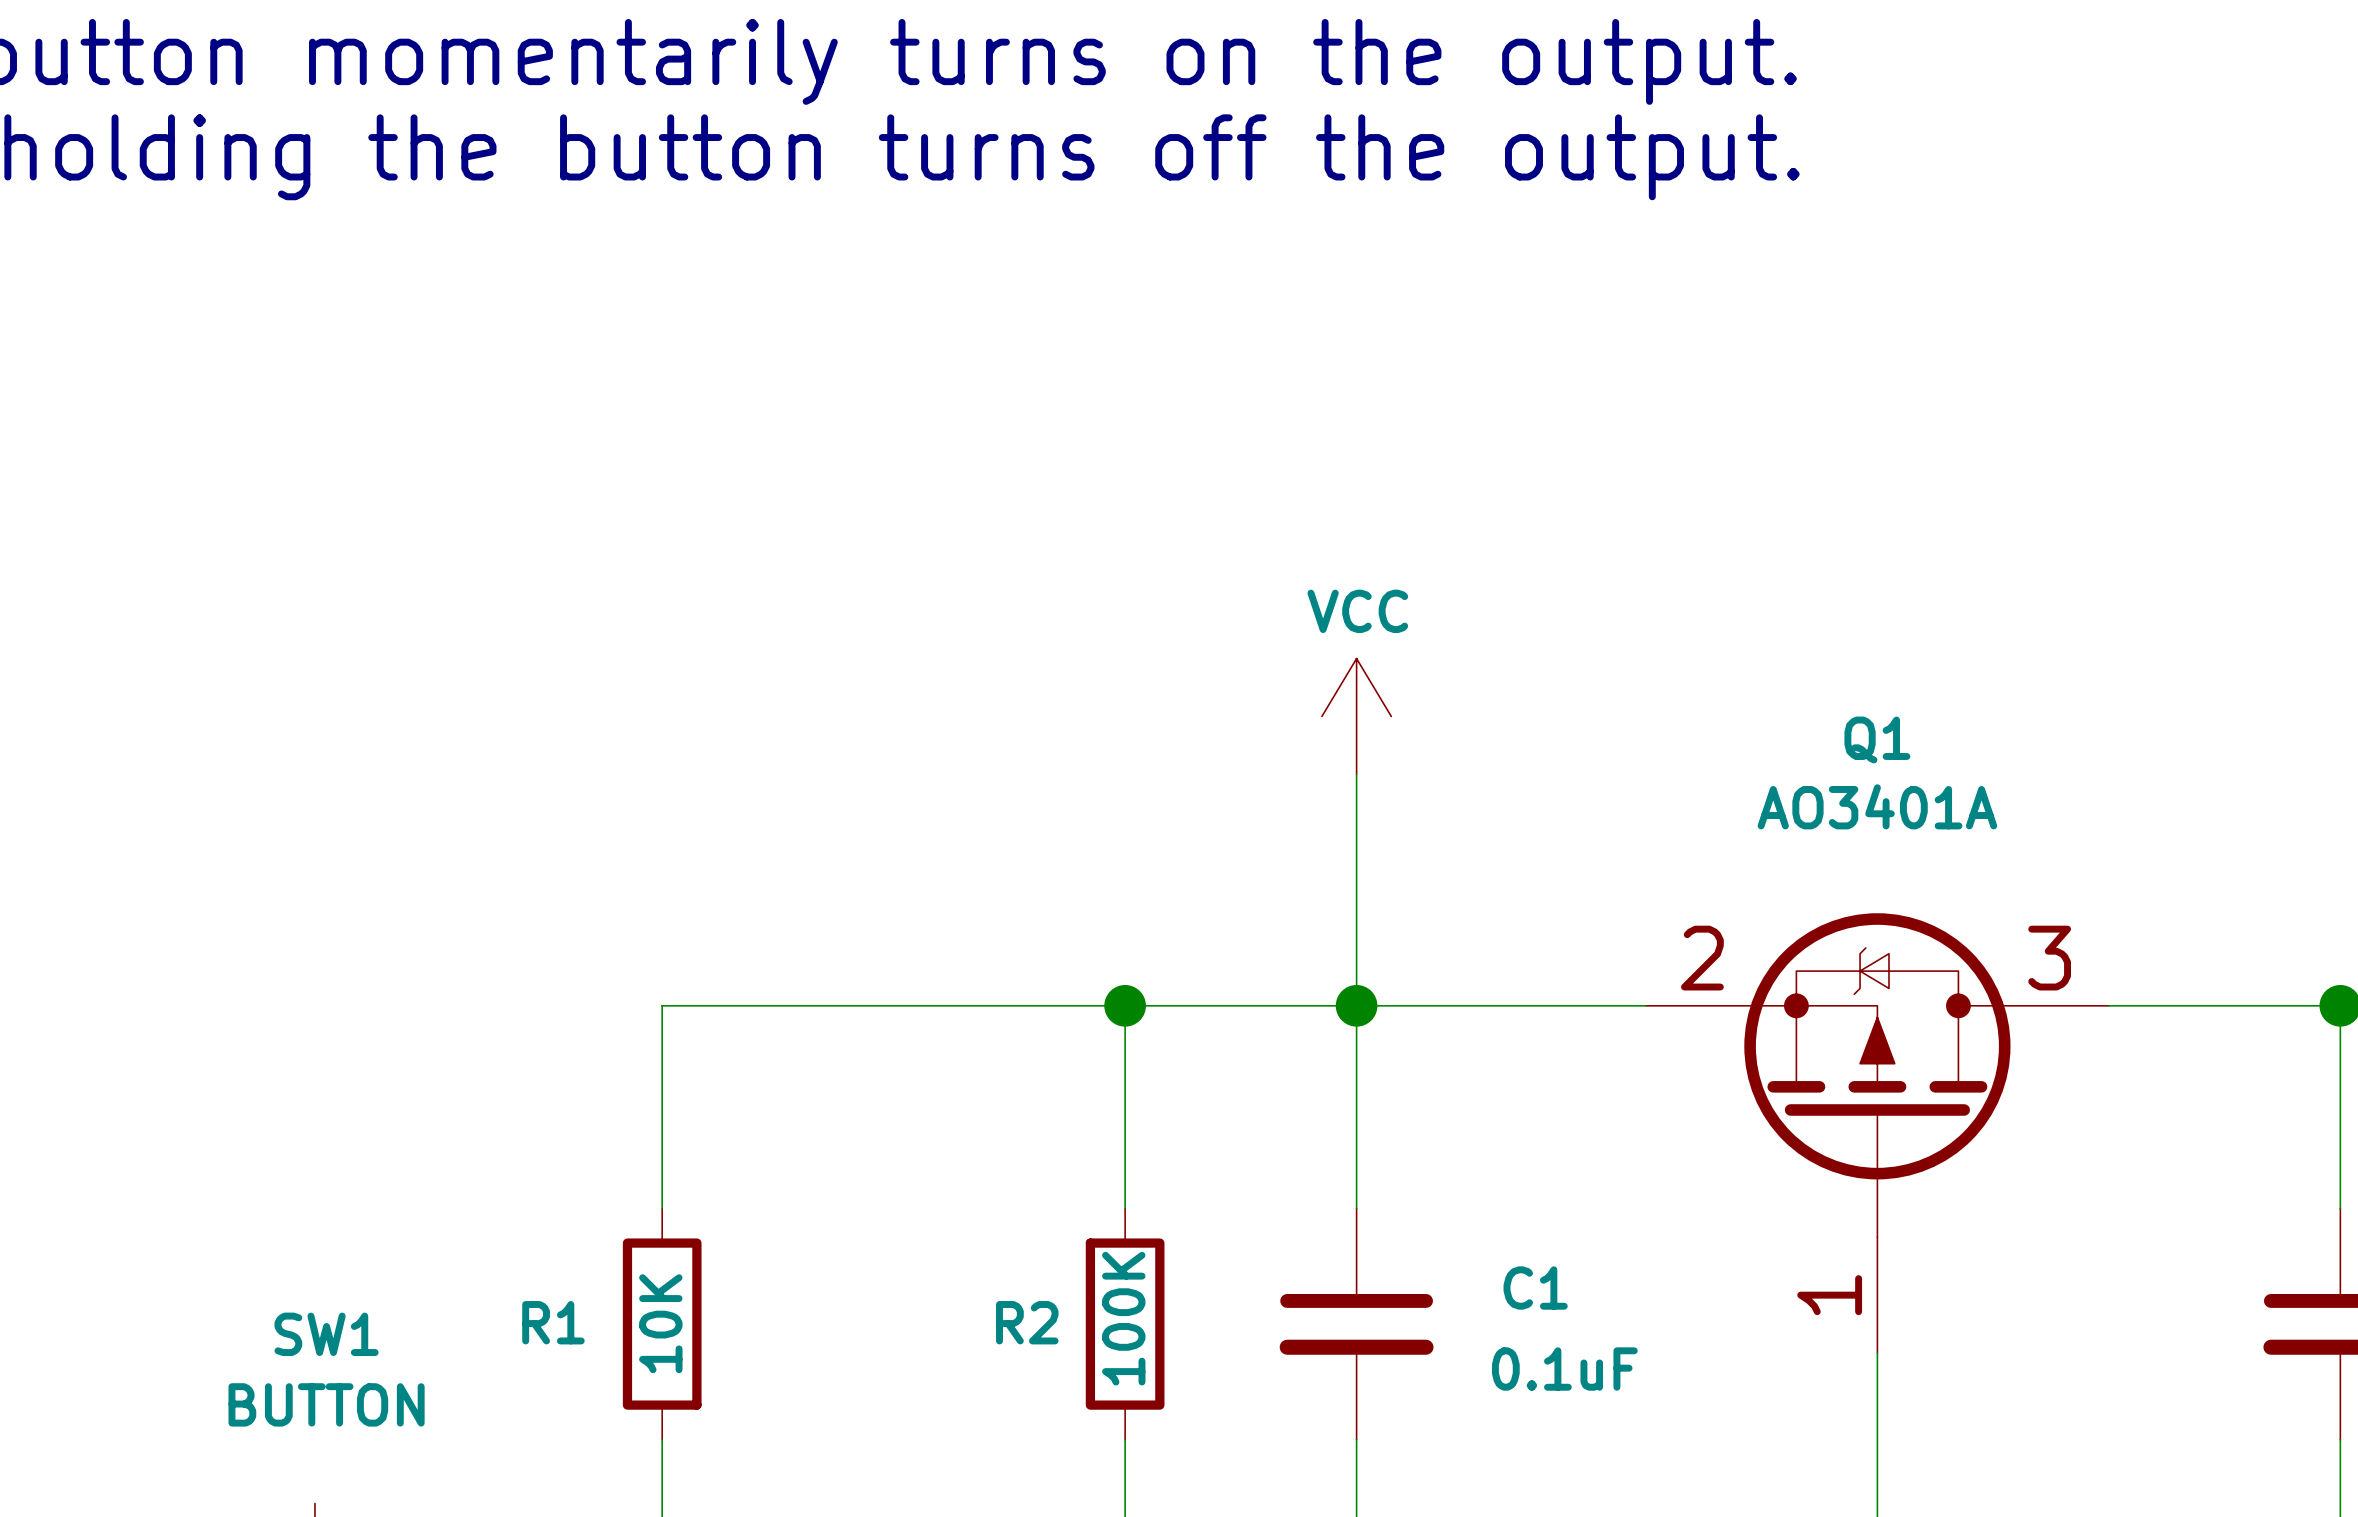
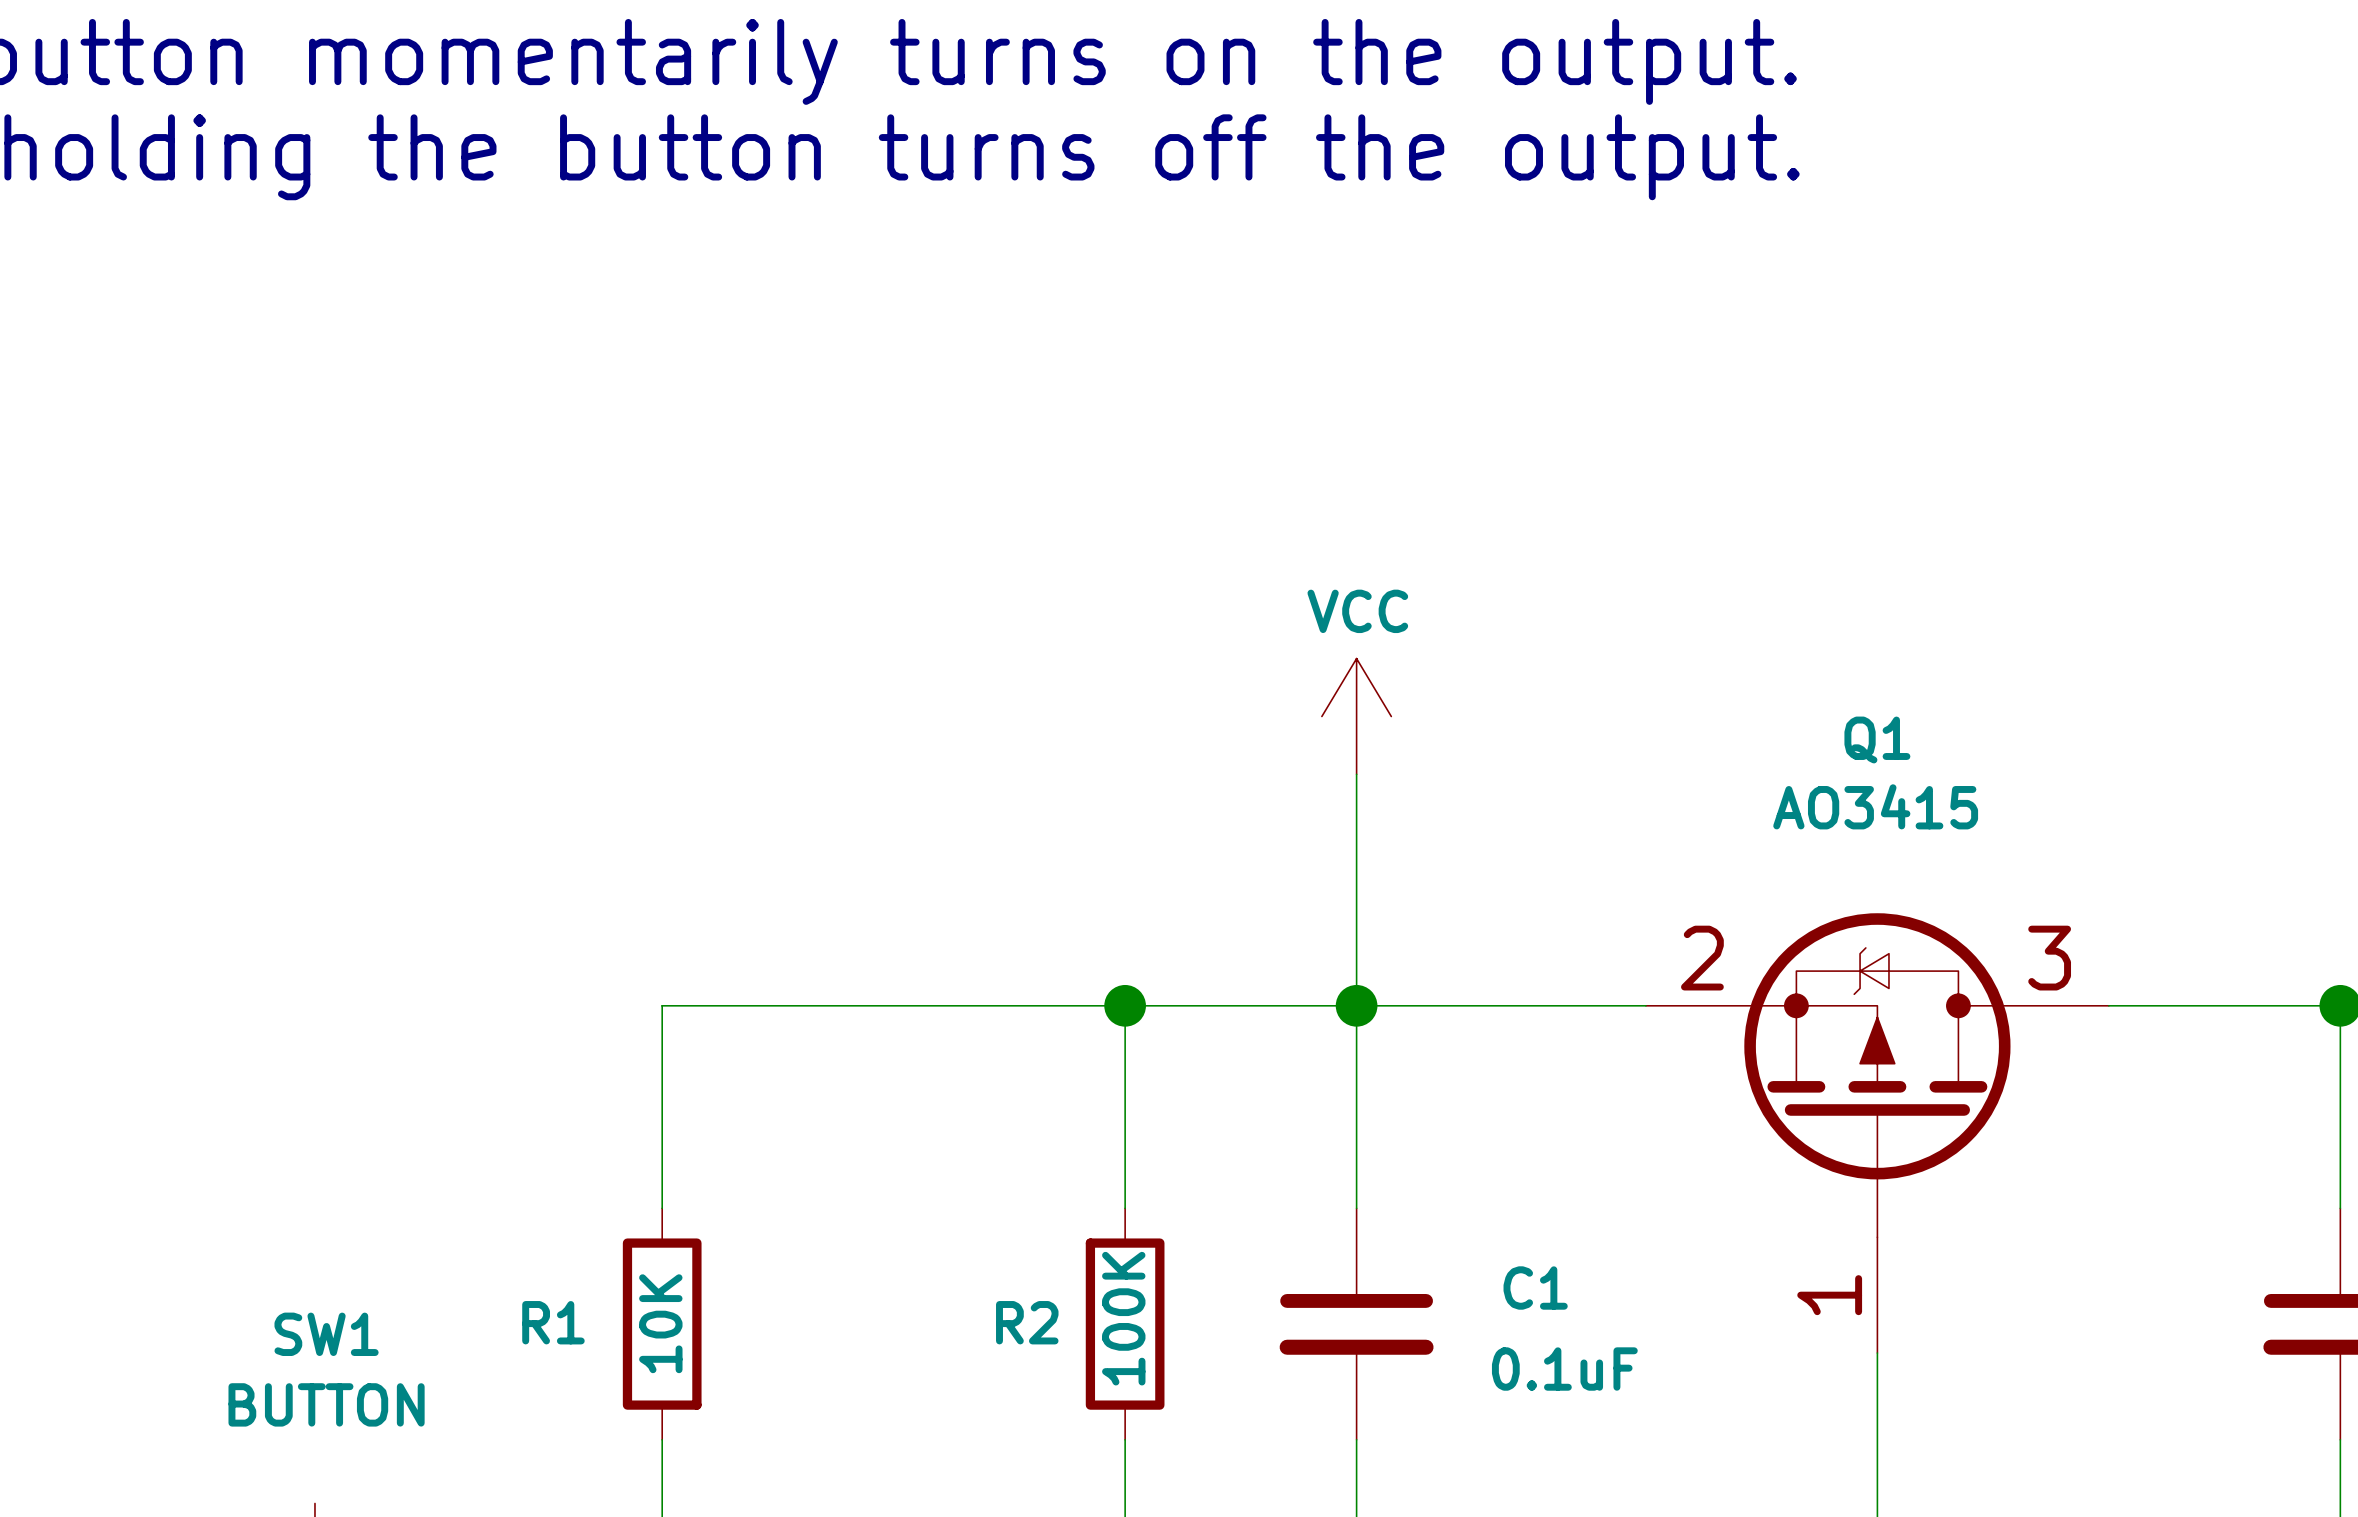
Q1 value: AO3401A (1877, 806) -> AO3415 (1875, 806)

